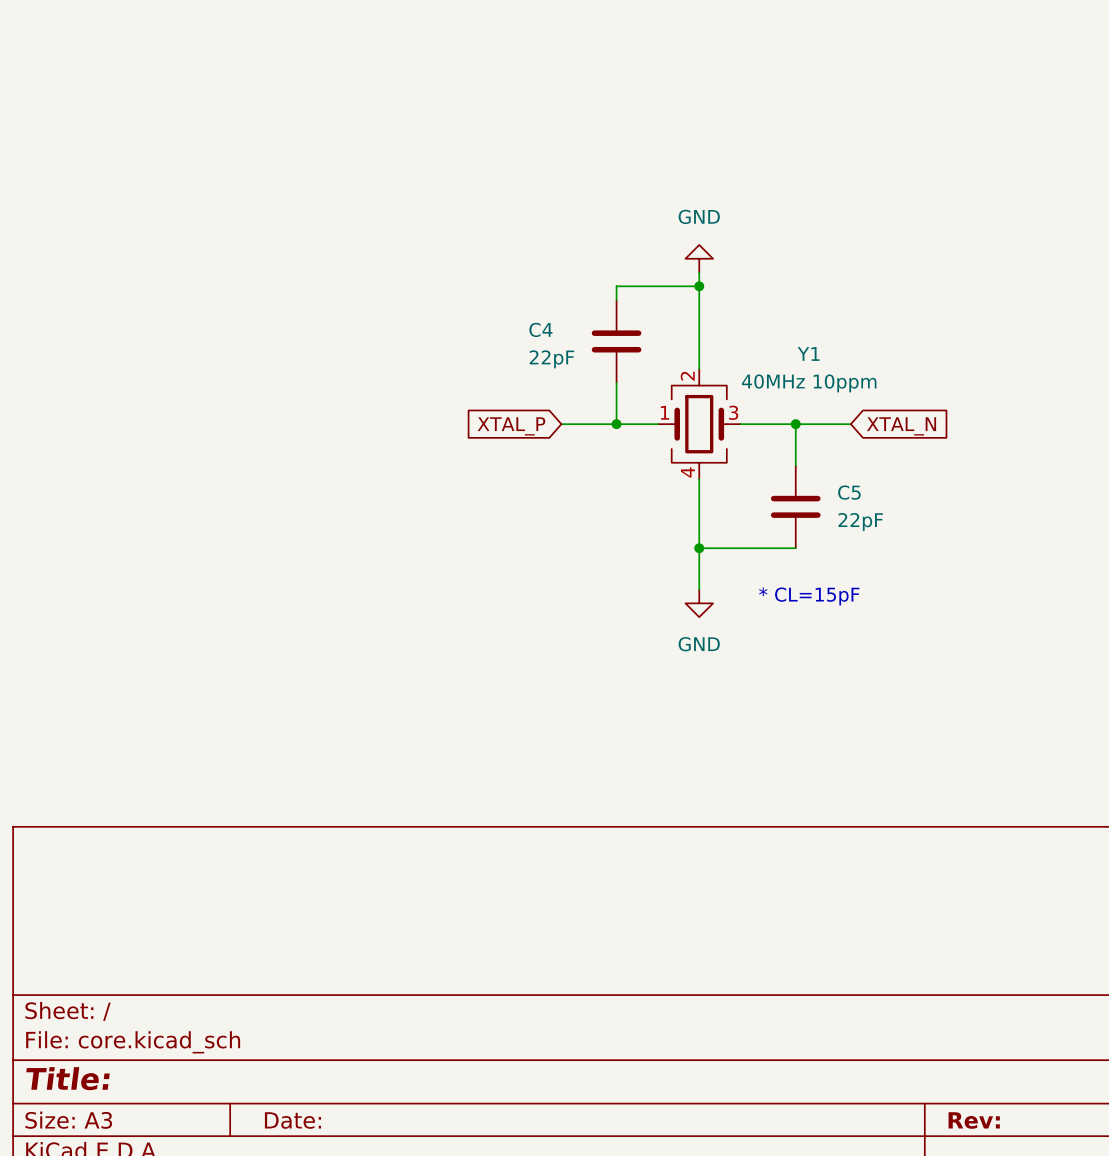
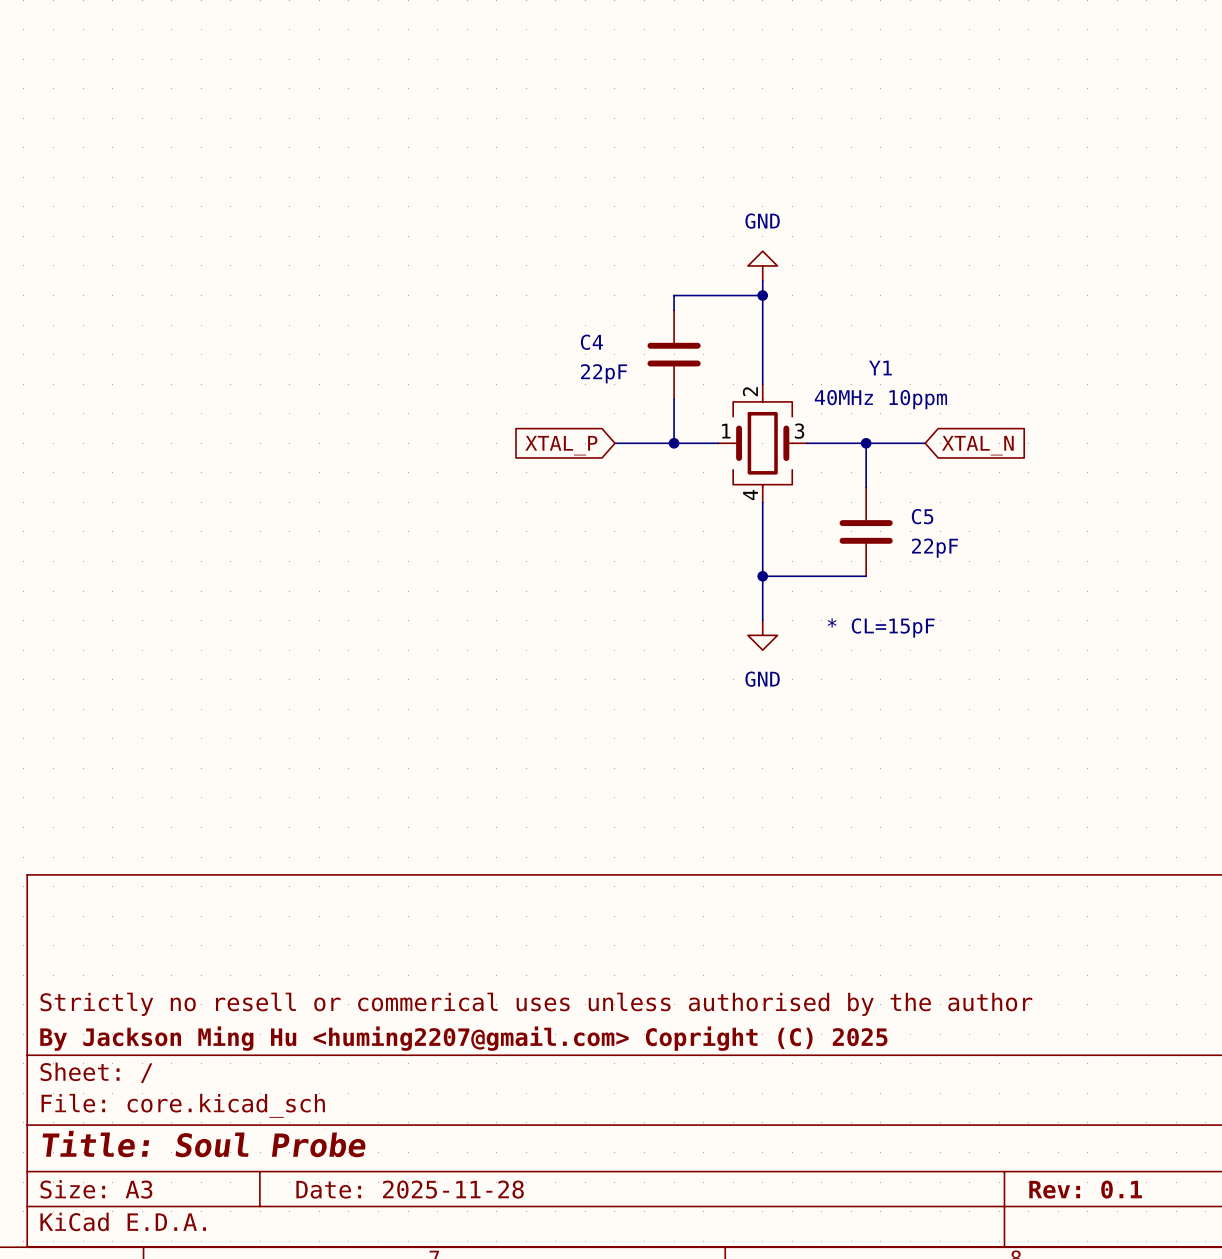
title block: none -> Strictly no resell or commerical uses unless authorised by the author (536, 1004)
title block: none -> By Jackson Ming Hu <huming2207@gmail.com> Copright (C) 2025 (463, 1038)
title block: Title: (67, 1078) -> Title: Soul Probe (204, 1144)
title block: Date: (292, 1120) -> Date: 2025-11-28 (410, 1189)
title block: Rev: (974, 1120) -> Rev: 0.1 (1085, 1189)

